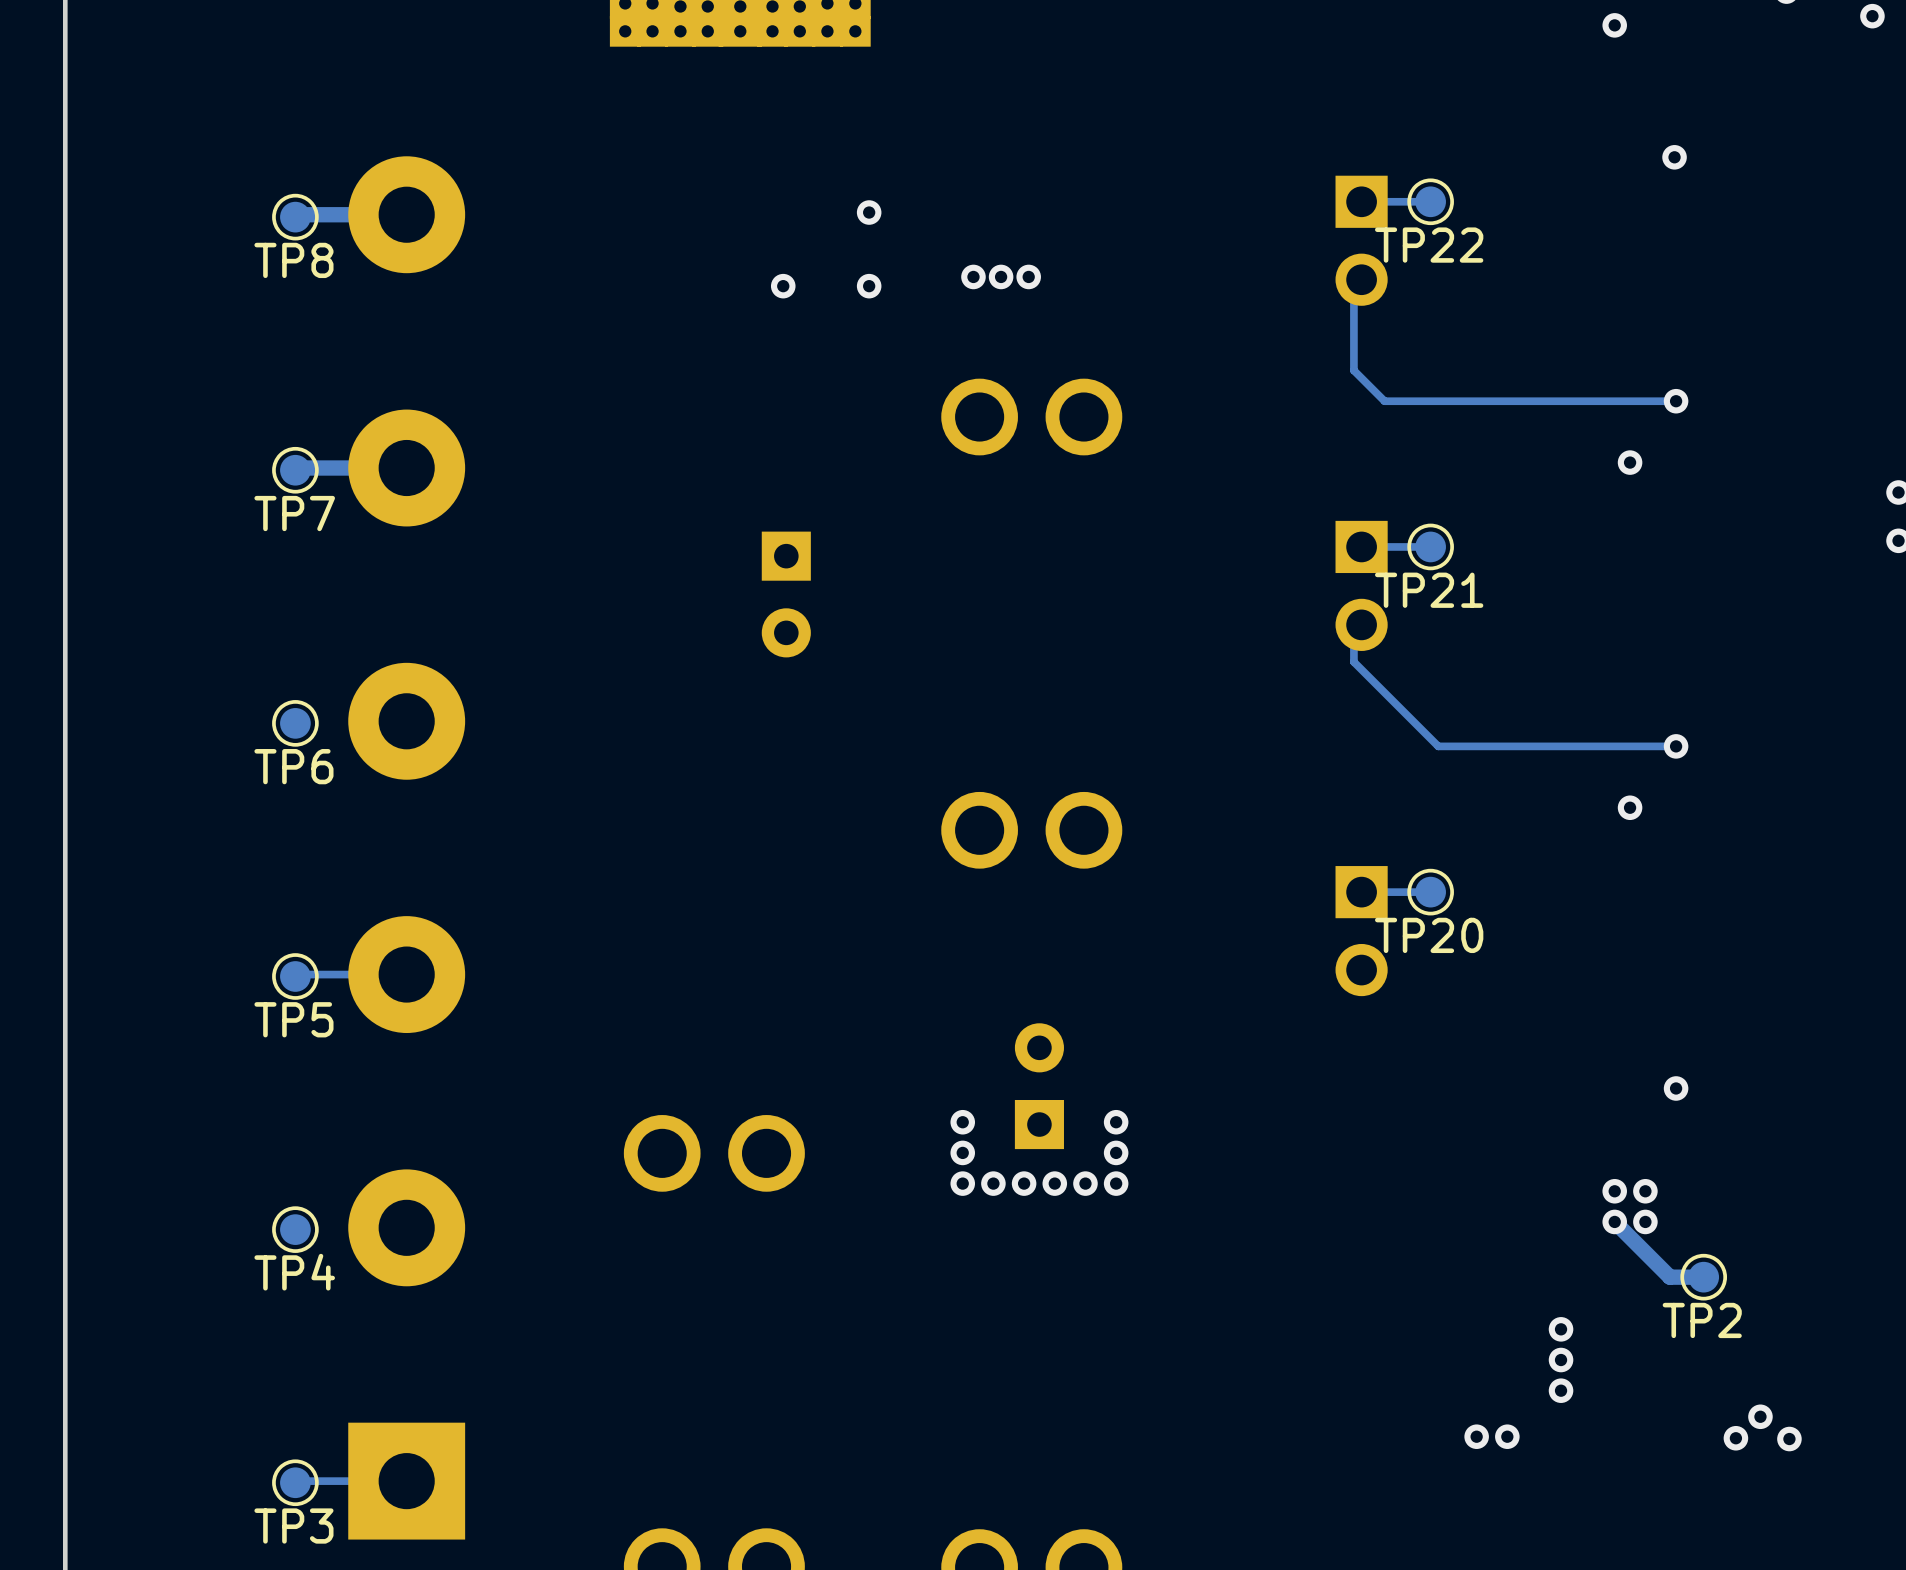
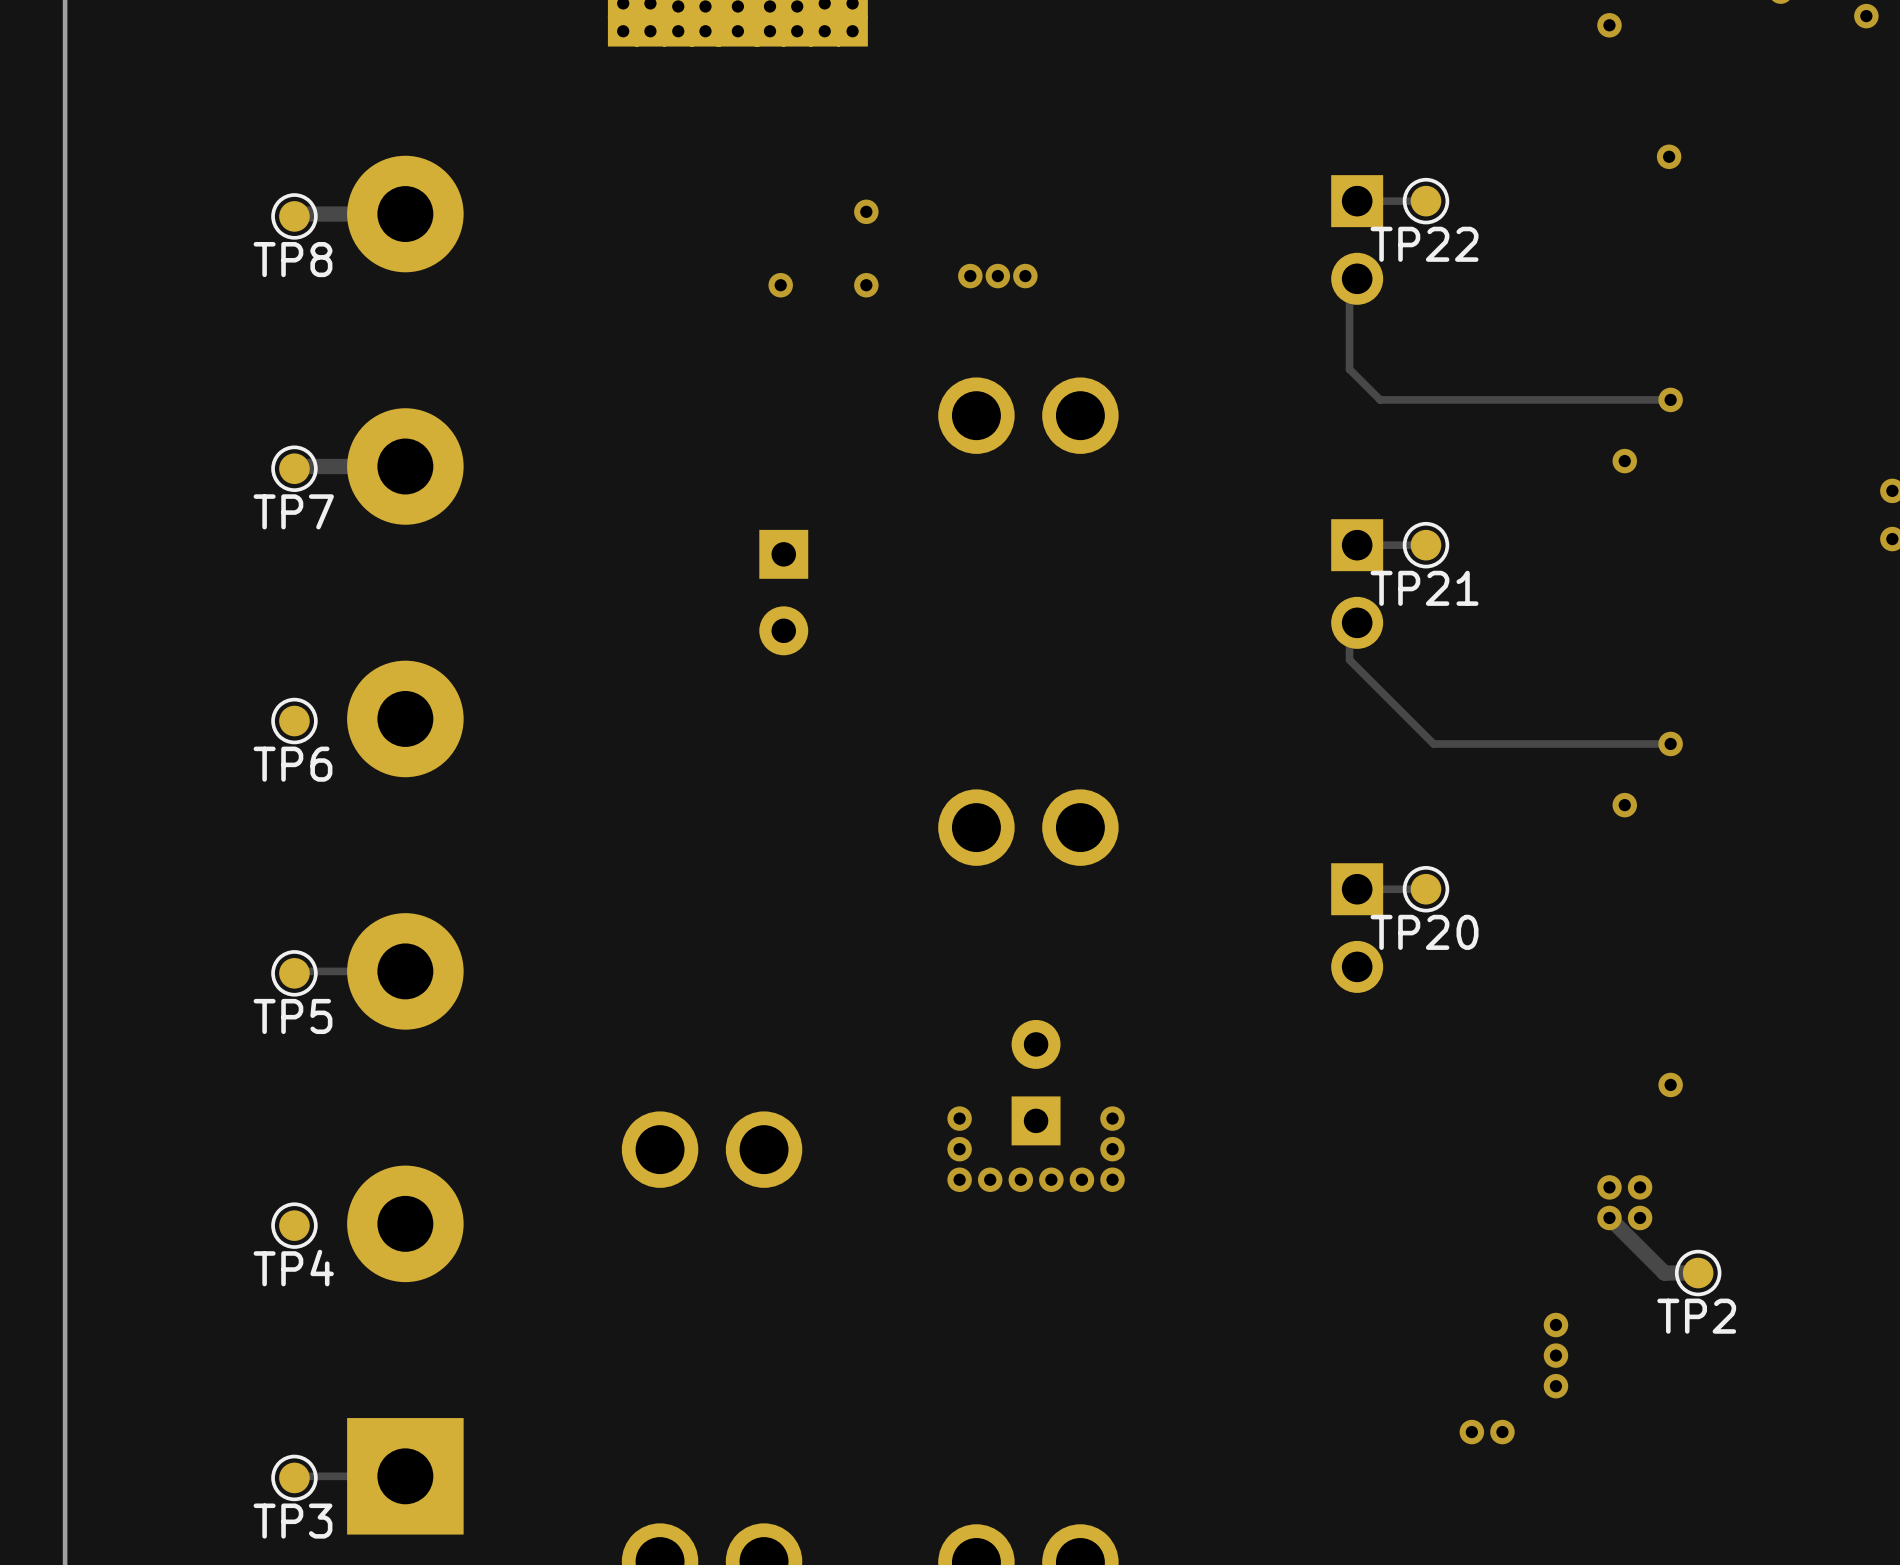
via: (1760, 1416) -> none
via: (1735, 1438) -> none
via: (1789, 1439) -> none

